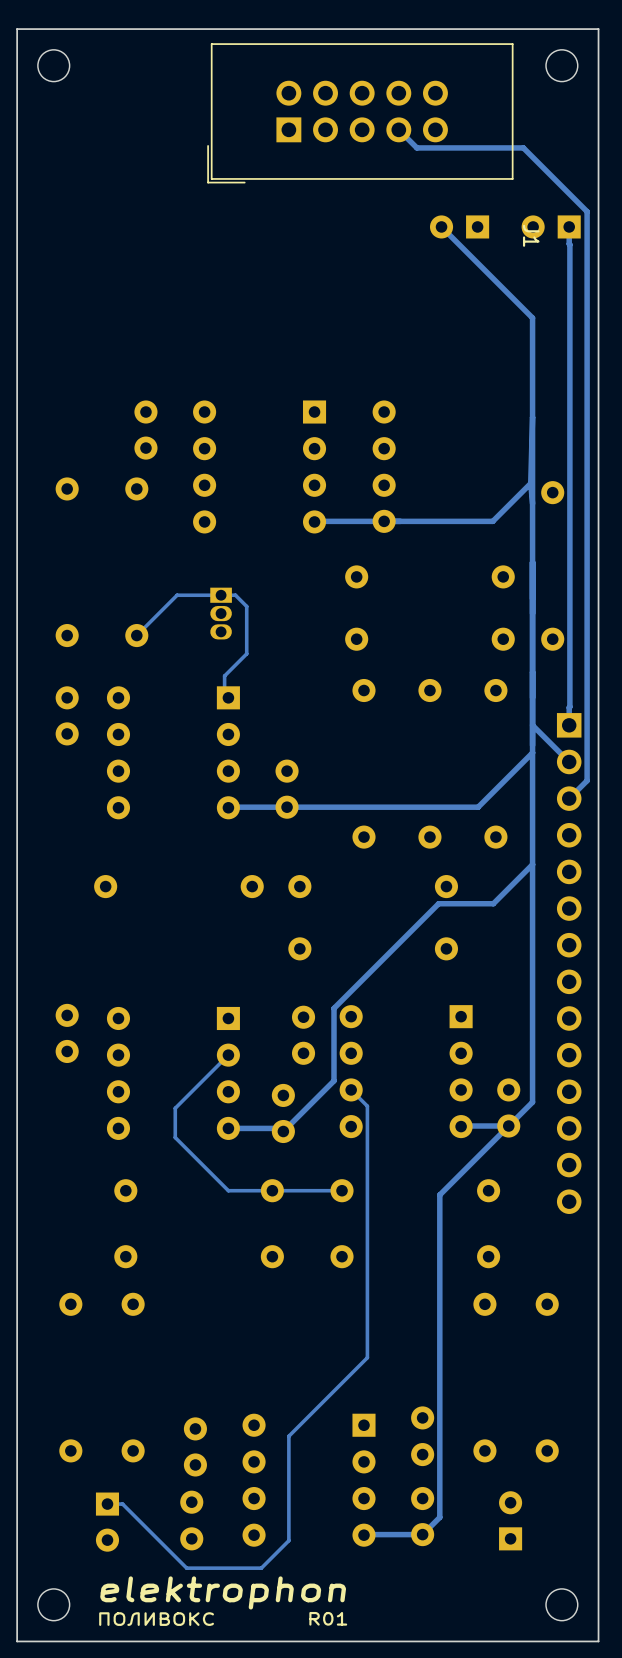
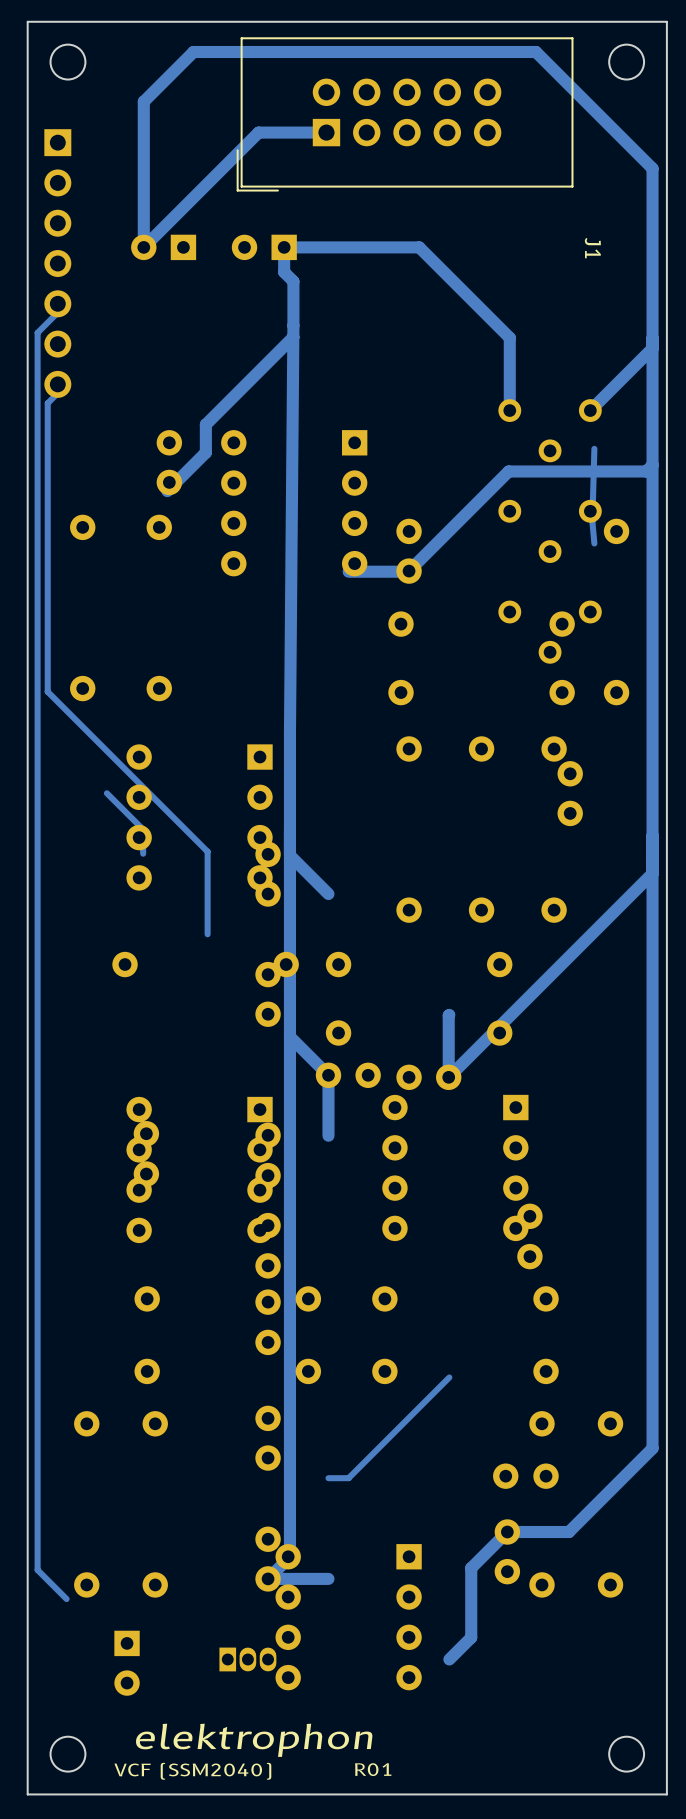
track: none -> (326, 132) (258, 132) (143, 247) (143, 101) (193, 52) (535, 52) (652, 168) (652, 1448) (568, 1532) (507, 1532) (471, 1568) (471, 1637) (449, 1659)
track: (398, 129) (416, 147) (523, 147) (587, 211) (587, 780) (569, 798) -> none
track: (441, 226) (532, 317) (532, 1102) (439, 1194) (439, 1517) (422, 1534) (364, 1535) -> none
part: (459, 226) -> none
part: (551, 226) -> none
track: (569, 226) (569, 725) -> none
part: none -> (163, 247)
part: none -> (264, 247)
part: none -> (57, 263)
track: none -> (66, 303) (37, 332) (37, 1570) (66, 1599)
track: none -> (293, 337) (205, 424) (205, 452) (167, 491)
track: none -> (652, 348) (590, 410)
track: none -> (66, 384) (47, 403) (47, 691) (207, 851) (207, 934)
track: none -> (509, 410) (509, 337) (419, 247) (284, 247) (284, 272) (293, 281) (289, 733) (289, 1557) (268, 1578) (328, 1578)
part: none -> (550, 430)
part: (384, 430) -> none
track: none -> (652, 465) (646, 471) (508, 471) (408, 571) (348, 571)
track: (530, 483) (492, 521) (314, 521) -> none
part: none -> (550, 531)
part position: (384, 503) -> (409, 551)
part: none -> (550, 632)
part: (221, 613) -> none
track: (136, 635) (177, 595) (235, 595) (246, 606) (246, 653) (224, 676) (224, 697) -> none
part: (67, 715) -> none
track: (532, 725) (569, 761) -> none
track: none -> (106, 793) (143, 829) (143, 853)
part: none -> (570, 793)
track: (532, 752) (478, 807) (228, 807) -> none
track: none -> (289, 855) (328, 894)
part position: (287, 789) -> (268, 874)
track: none -> (652, 873) (448, 1077) (449, 1014)
track: (532, 864) (493, 903) (438, 903) (334, 1008) (334, 1080) (283, 1131) (280, 1128) (228, 1128) -> none
part: none -> (268, 994)
track: none -> (289, 1036) (328, 1075) (328, 1135)
part: (569, 963) -> none
part: none -> (348, 1075)
part: none -> (428, 1077)
part: (67, 1033) -> none
part: (303, 1035) -> none
track: (228, 1055) (175, 1108) (175, 1137) (228, 1190) (342, 1190) -> none
part: none -> (146, 1153)
part: none -> (268, 1155)
track: (351, 1089) (367, 1106) (367, 1357) (288, 1436) (288, 1540) (261, 1568) (186, 1568) (122, 1504) (107, 1504) -> none
part: (508, 1107) -> none
part: (283, 1113) -> none
track: (508, 1126) (461, 1126) -> none
part: none -> (529, 1236)
part: none -> (268, 1245)
part: none -> (268, 1322)
track: none -> (449, 1377) (348, 1478) (328, 1478)
part: none -> (268, 1438)
part rotation: 0° (422, 1436) -> 90° clockwise (525, 1476)
part position: (422, 1436) -> (525, 1476)
part position: (195, 1446) -> (268, 1559)
part position: (422, 1516) -> (507, 1551)
part: none -> (247, 1659)
part: (191, 1520) -> none
part: (510, 1520) -> none
drawing shape: [99, 1576, 348, 1626] -> [114, 1723, 392, 1780]

